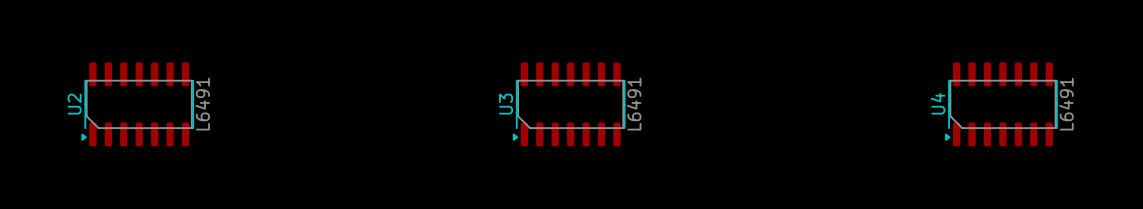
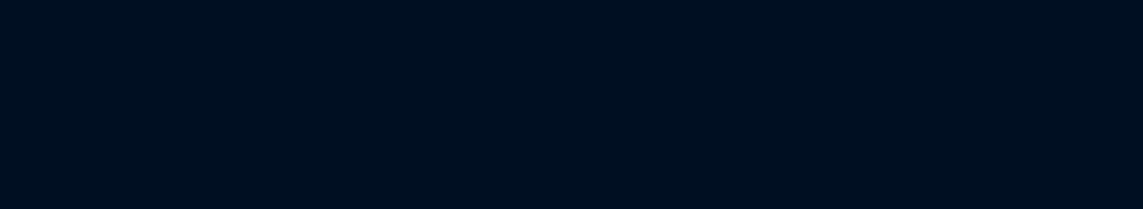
U2: L6491 (137, 104) -> none
U3: L6491 (569, 104) -> none
U4: L6491 (1001, 104) -> none

